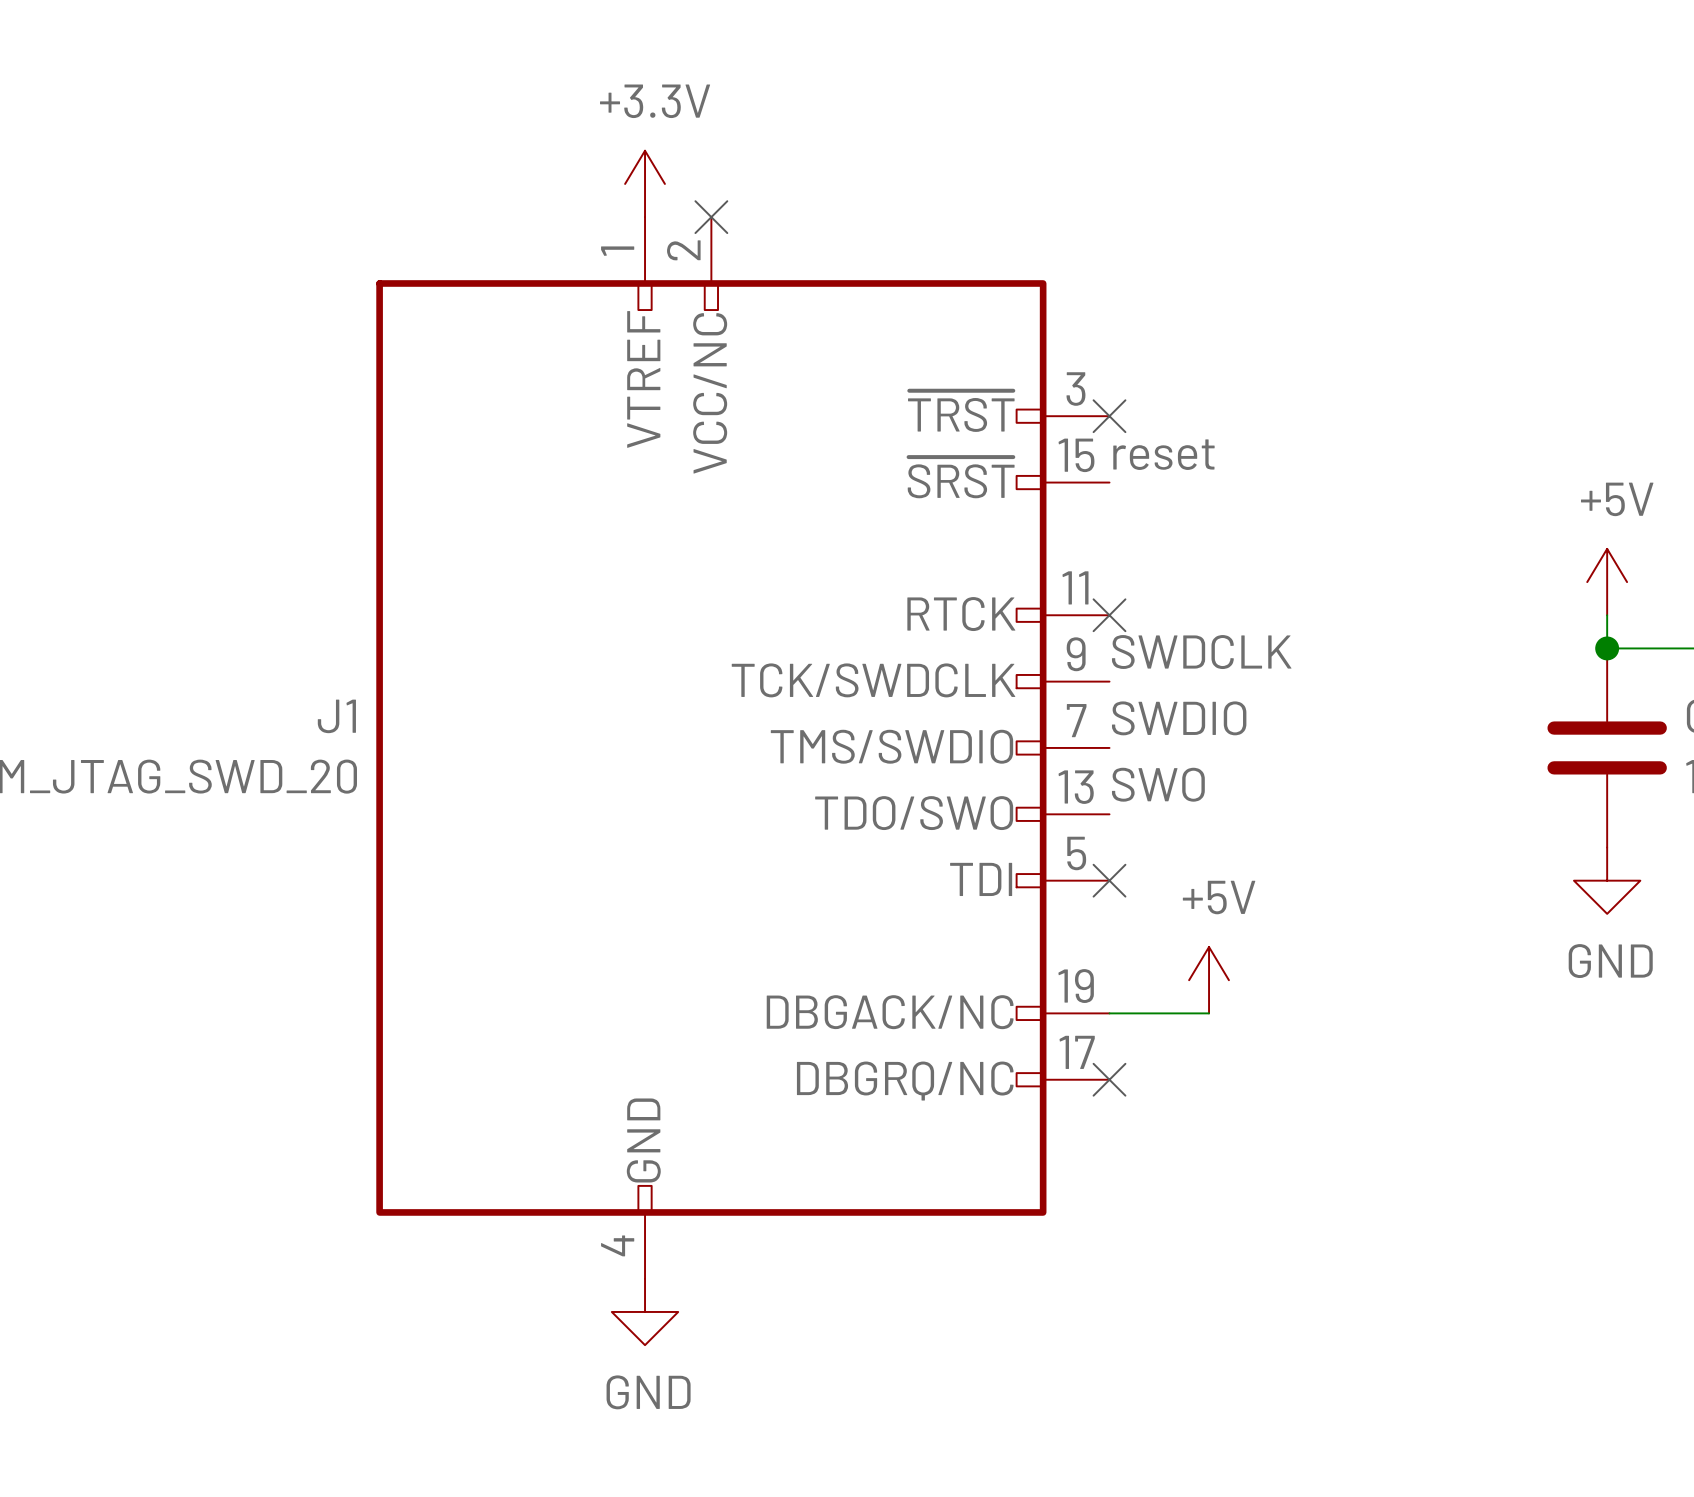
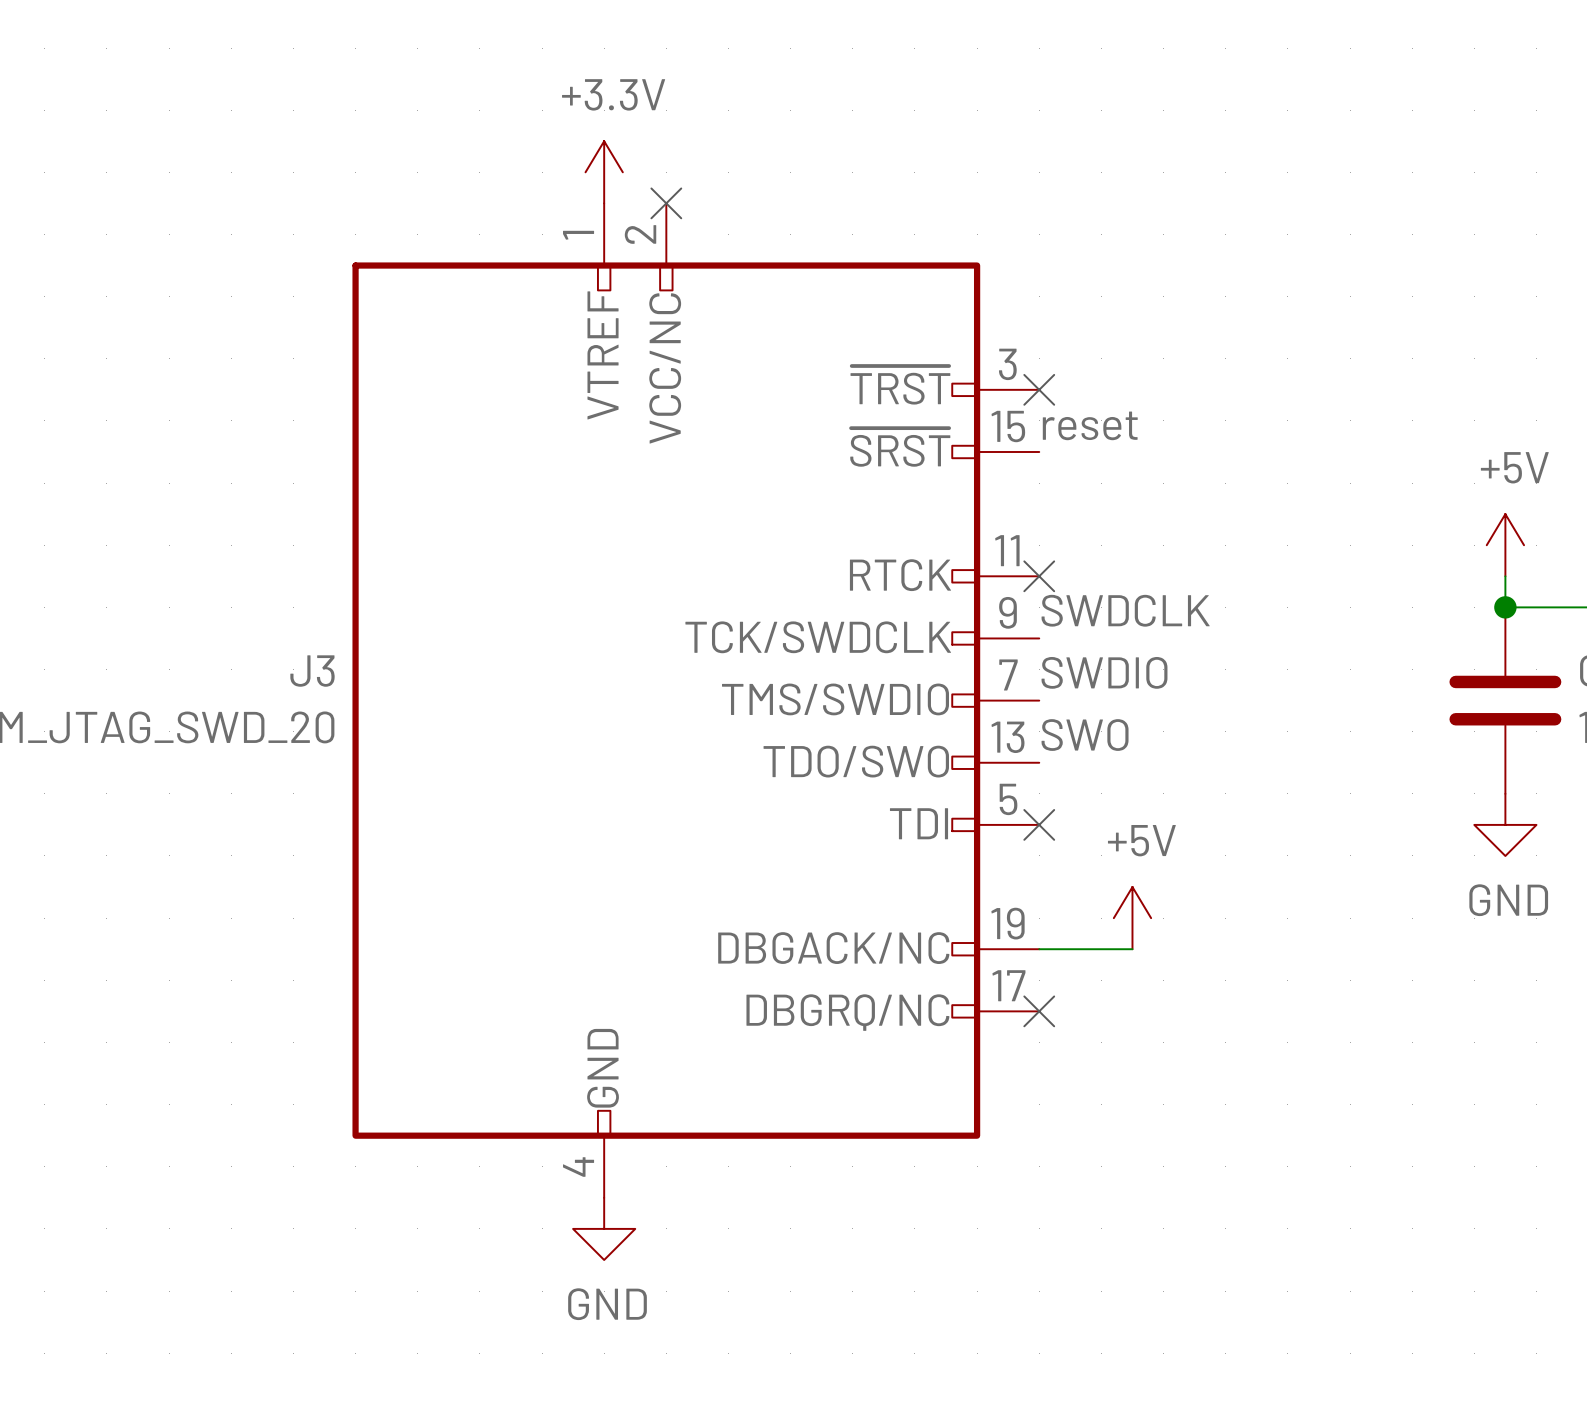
J1 name: J1 (336, 716) -> J3 (312, 671)

